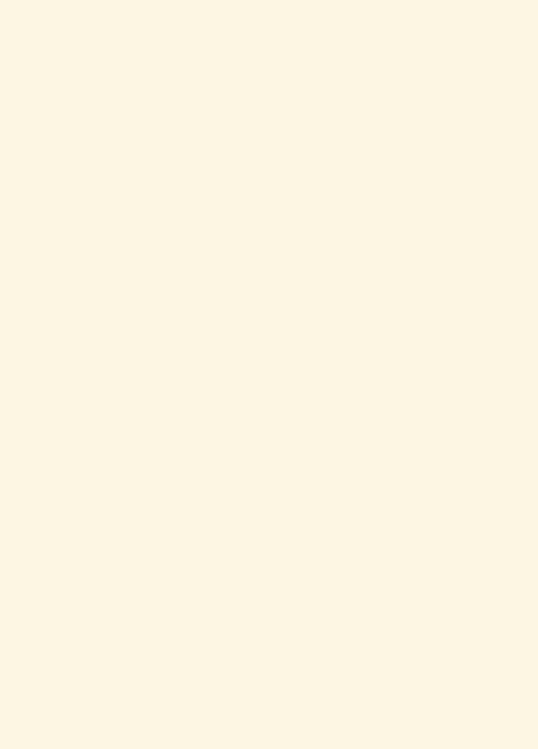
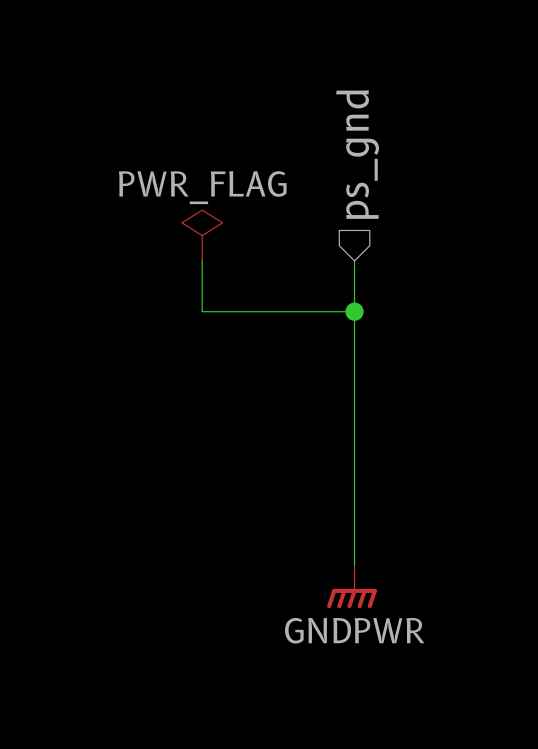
hierarchical label: none -> ps_gnd (357, 154)
power symbol: none -> PWR_FLAG (202, 235)
wire: none -> (202, 260) (202, 311) (354, 311)
wire: none -> (354, 260) (354, 565)
junction: none -> (354, 311)
power symbol: none -> GNDPWR (352, 586)

